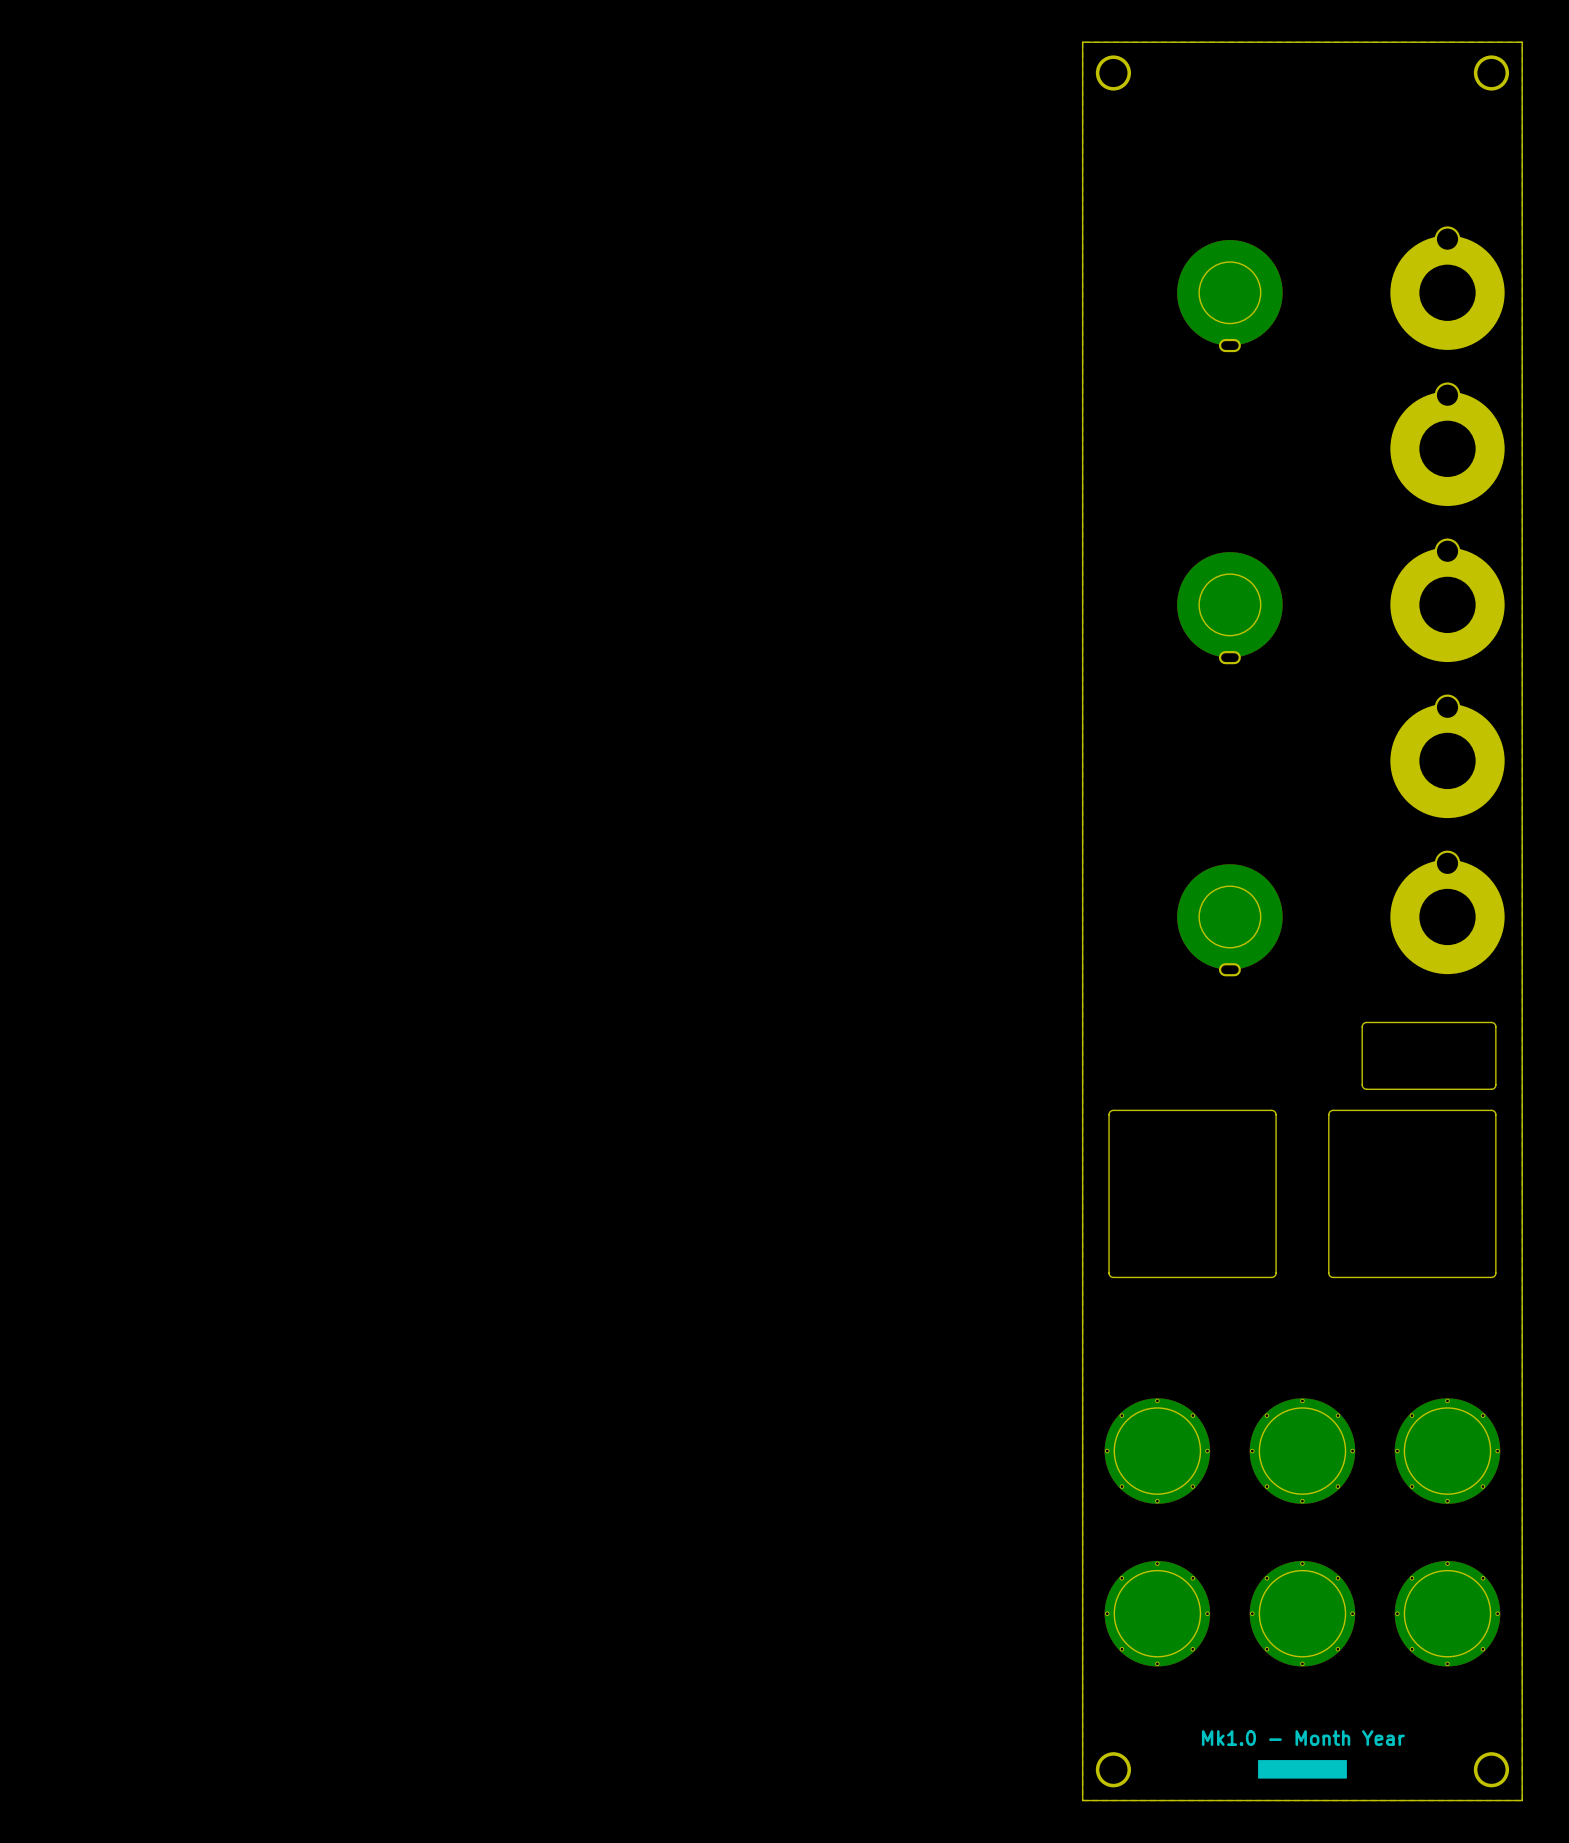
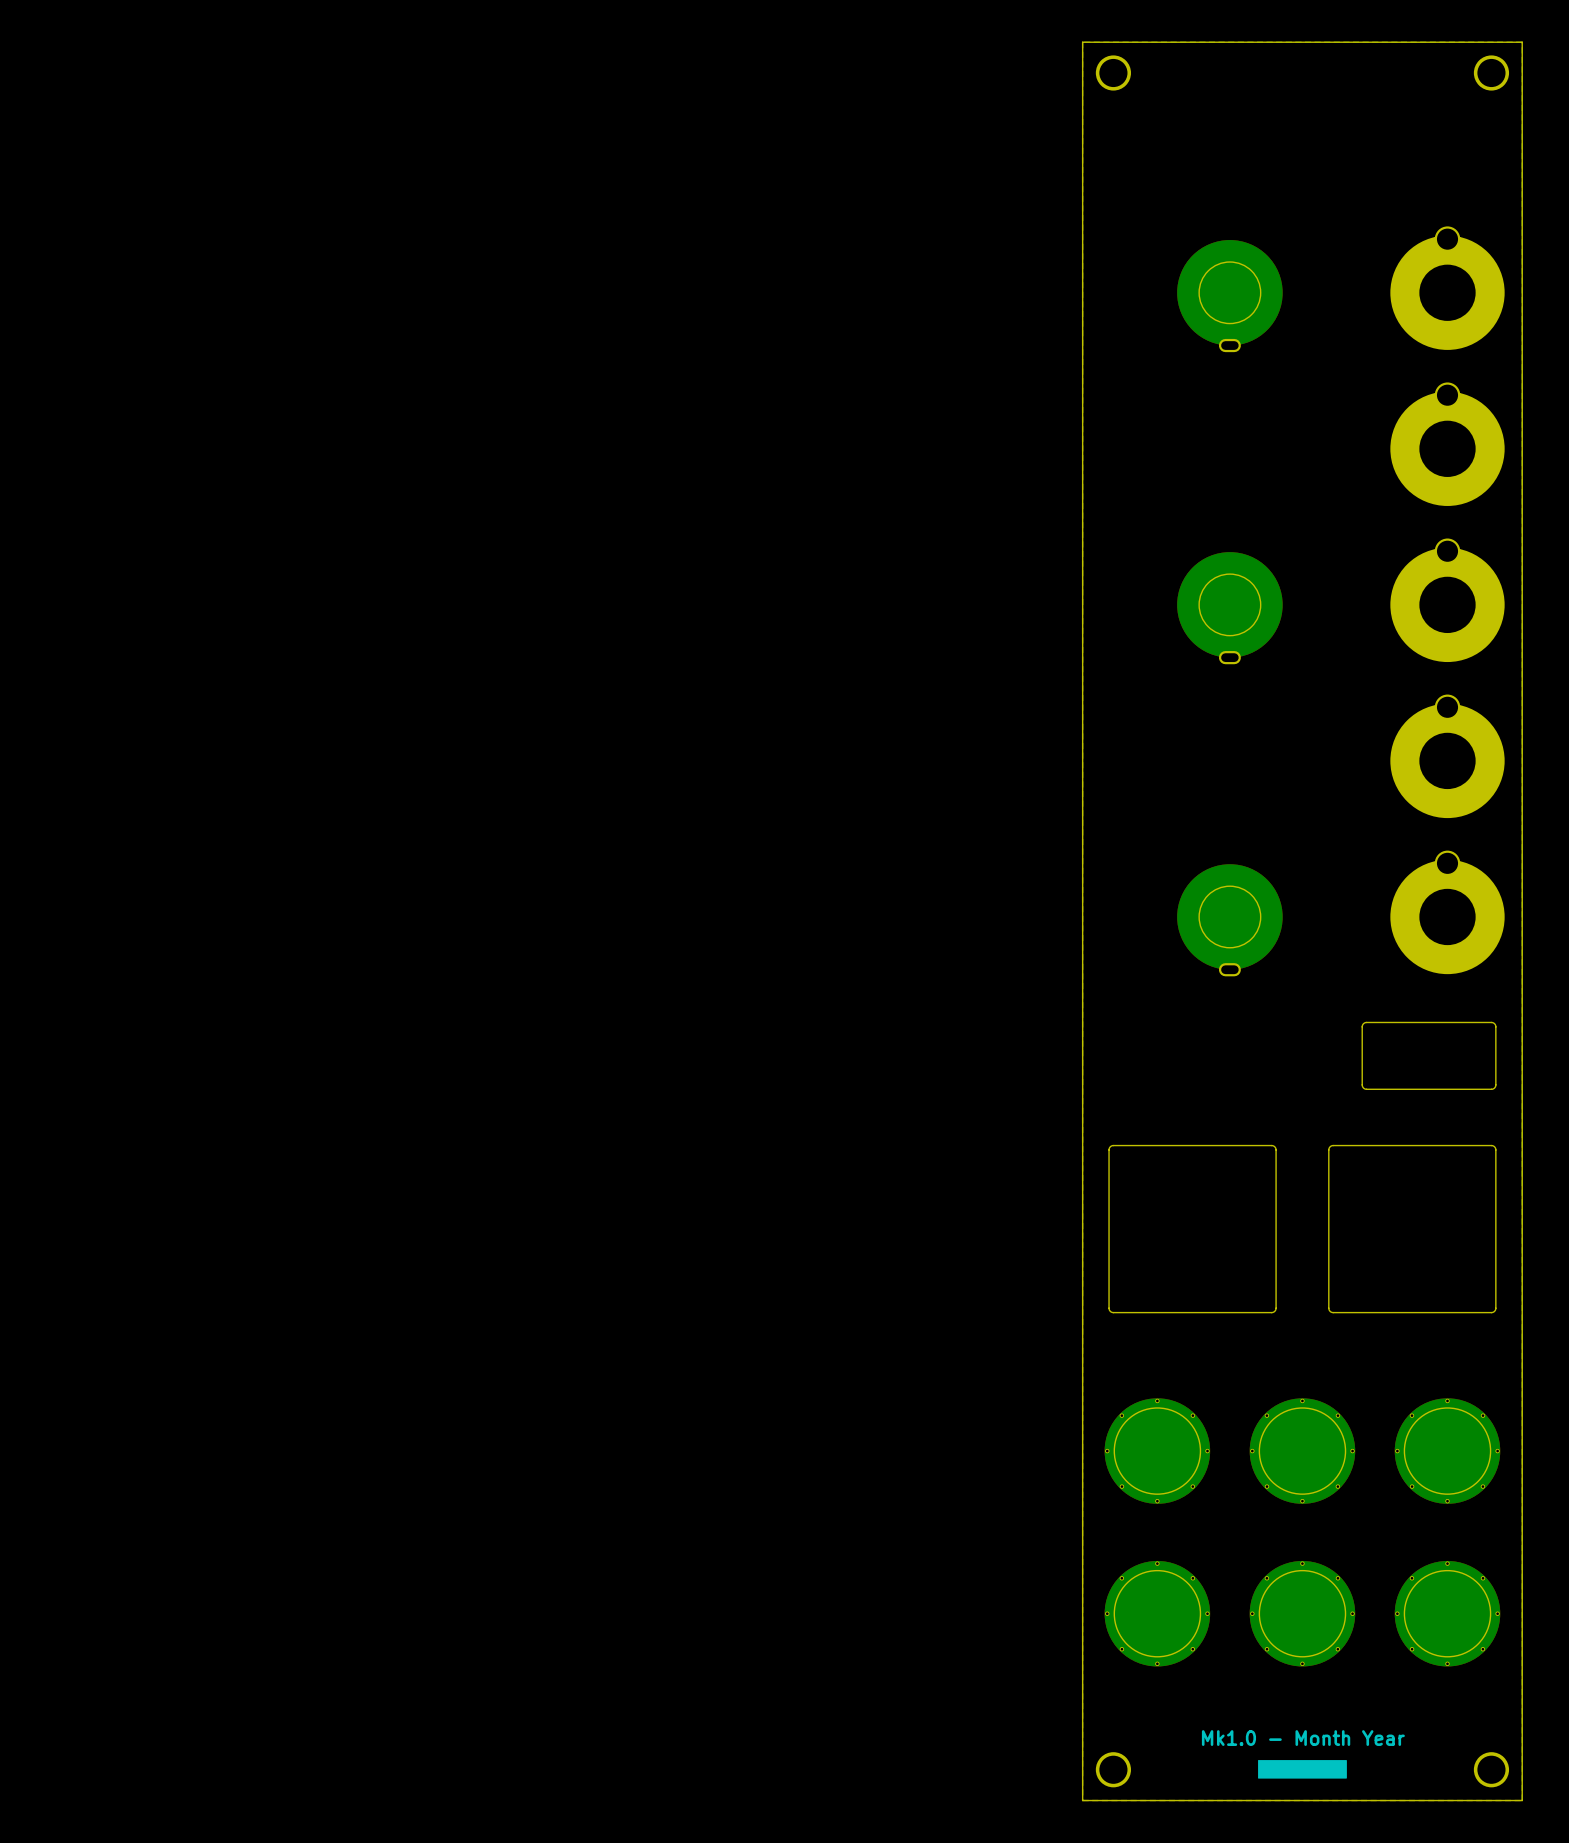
drawing position: (1192, 1193) -> (1192, 1229)
drawing position: (1412, 1193) -> (1412, 1229)

